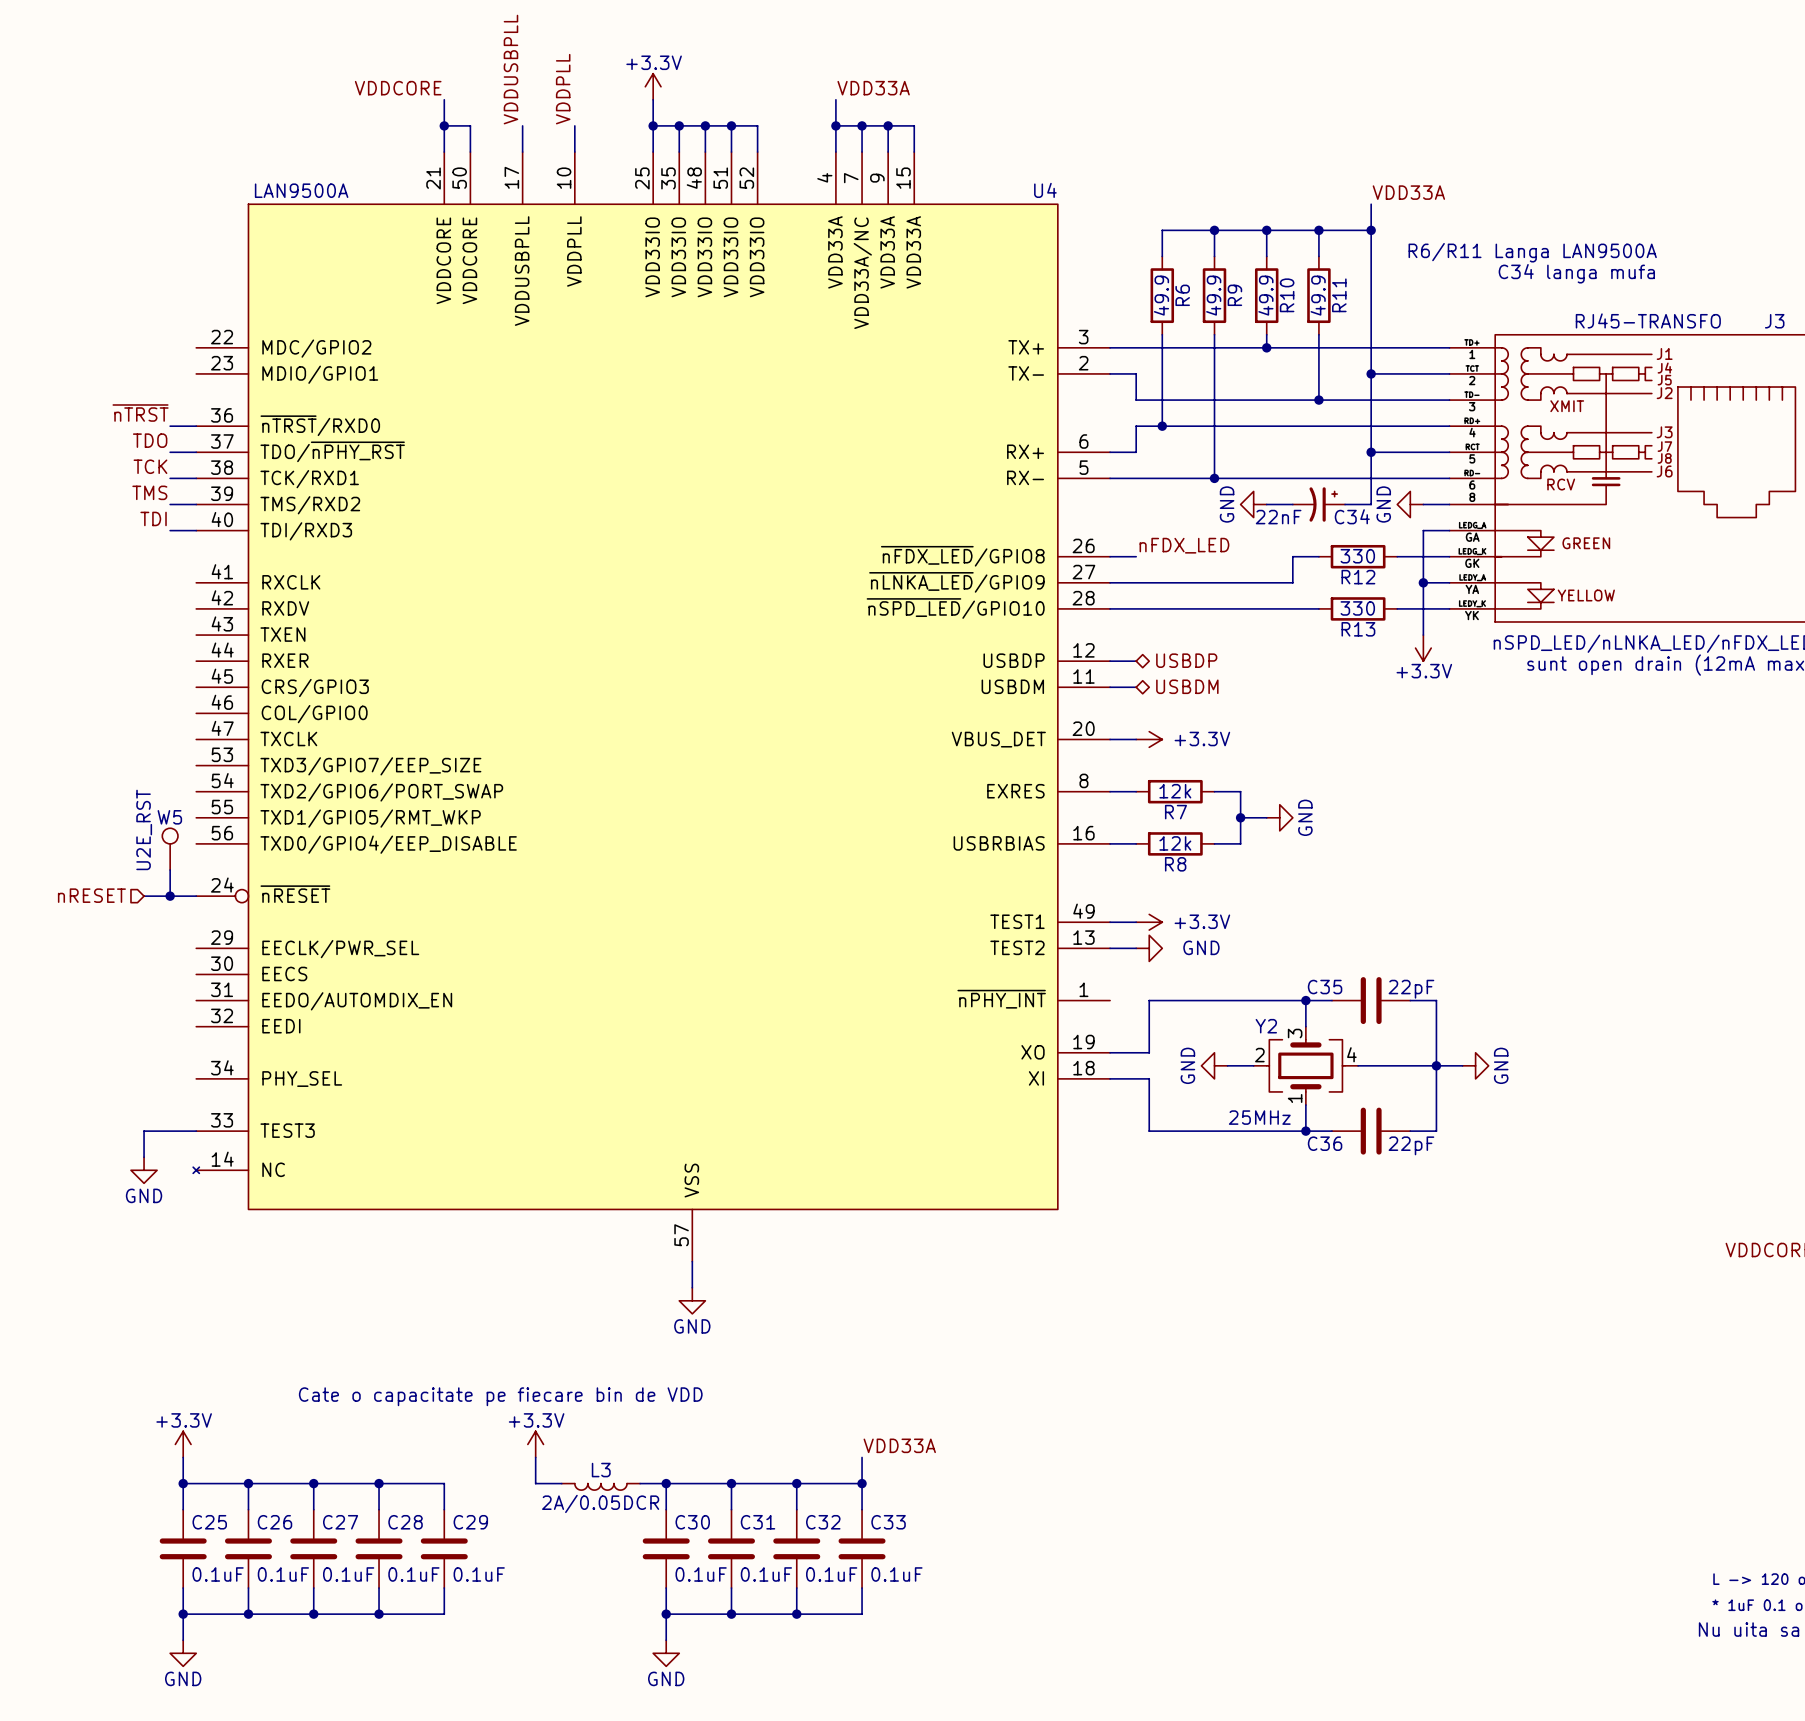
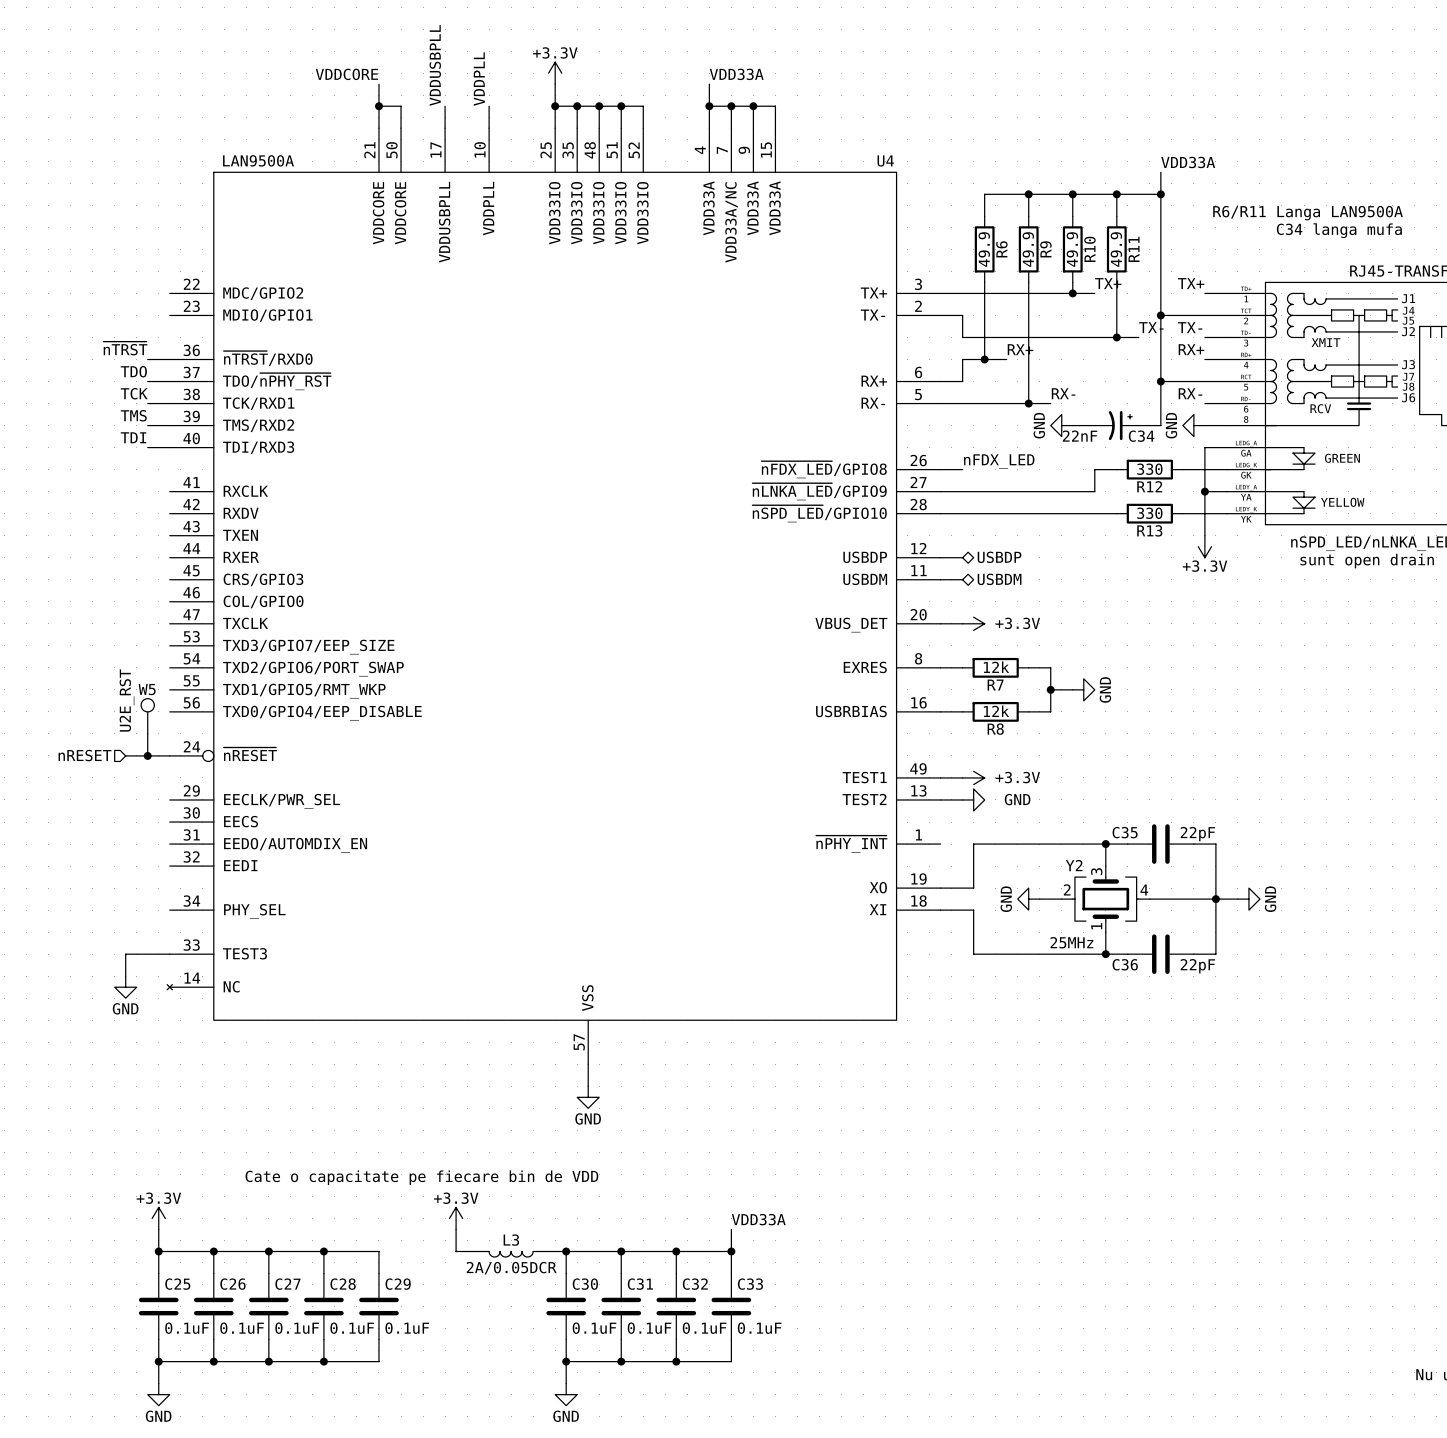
label: none -> TX+ (1108, 283)
label: none -> TX+ (1191, 283)
wire: (1292, 347) (1423, 347) -> none
label: none -> TX- (1151, 327)
label: none -> TX- (1190, 327)
wire: (1345, 400) (1423, 400) -> none
label: none -> RX+ (1020, 349)
label: none -> RX+ (1191, 349)
wire: (1188, 426) (1423, 426) -> none
label: none -> RX- (1063, 393)
label: none -> RX- (1190, 393)
wire: (1240, 478) (1423, 478) -> none

